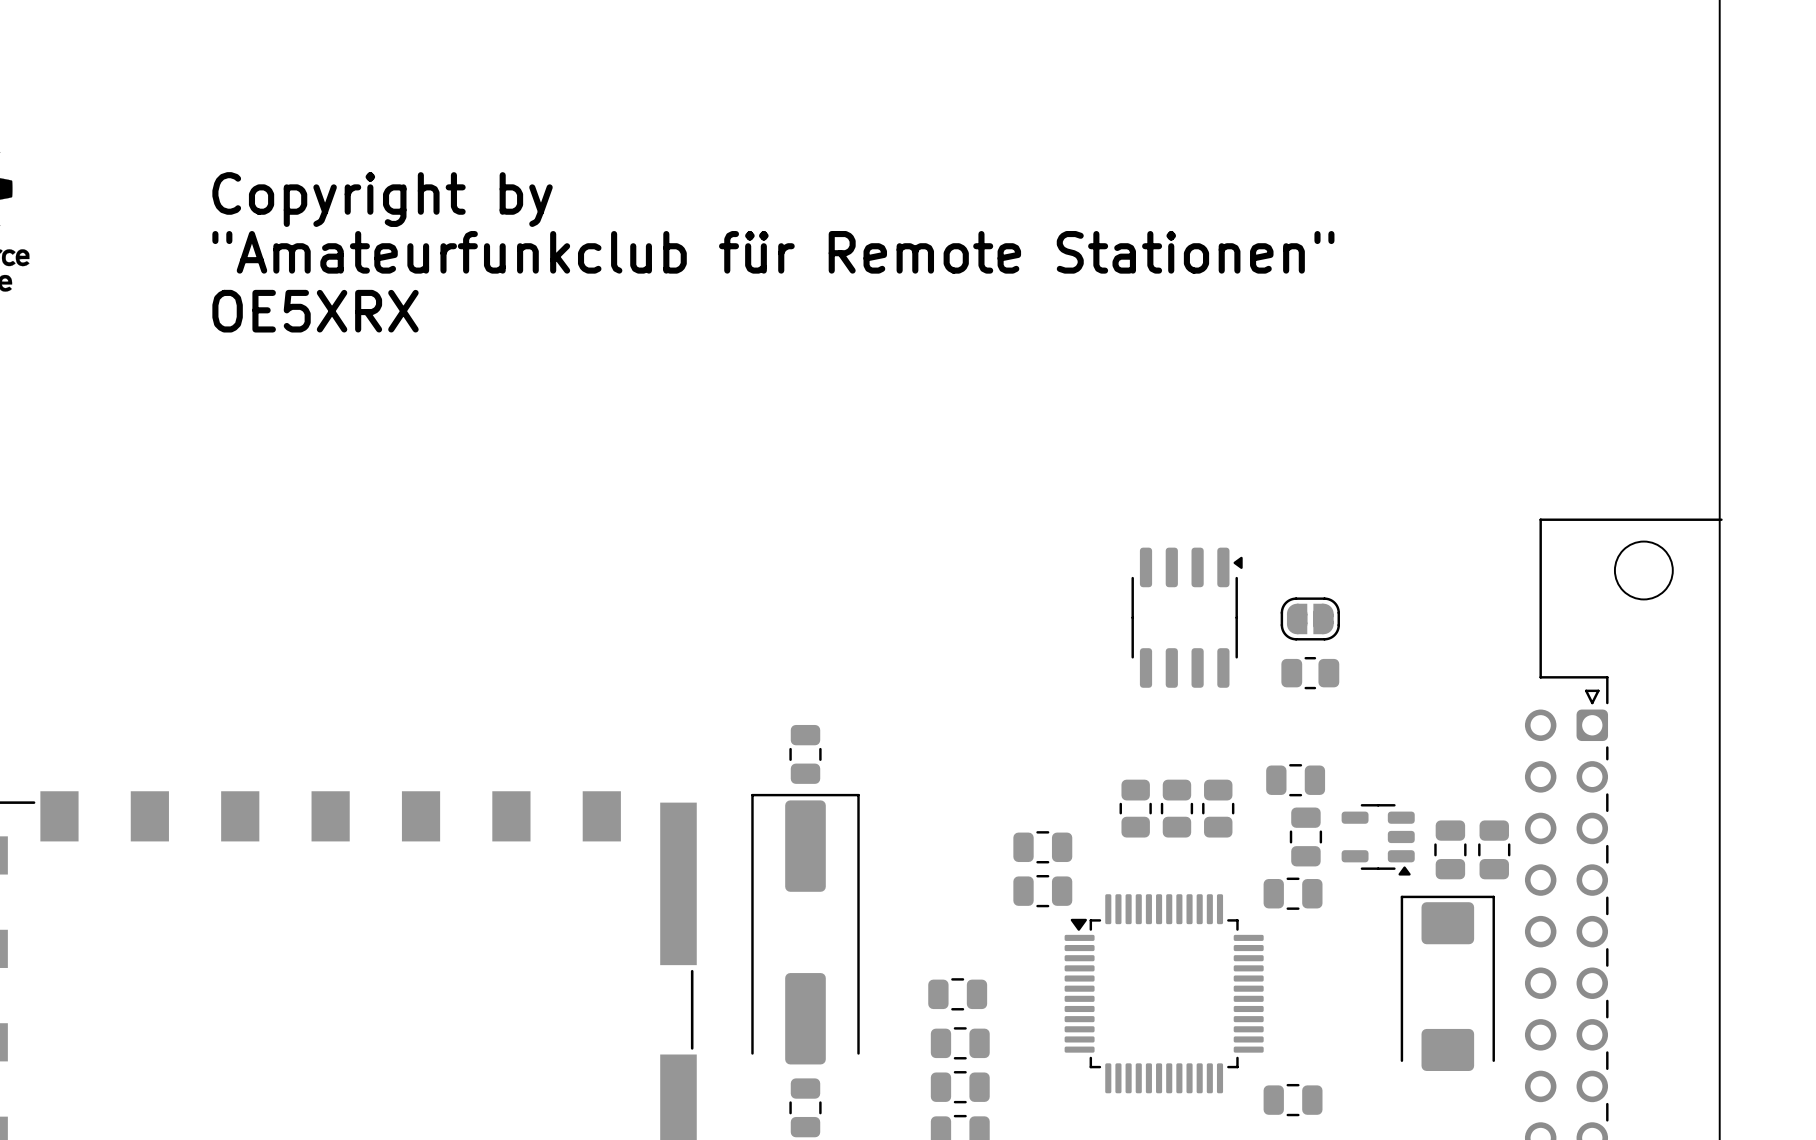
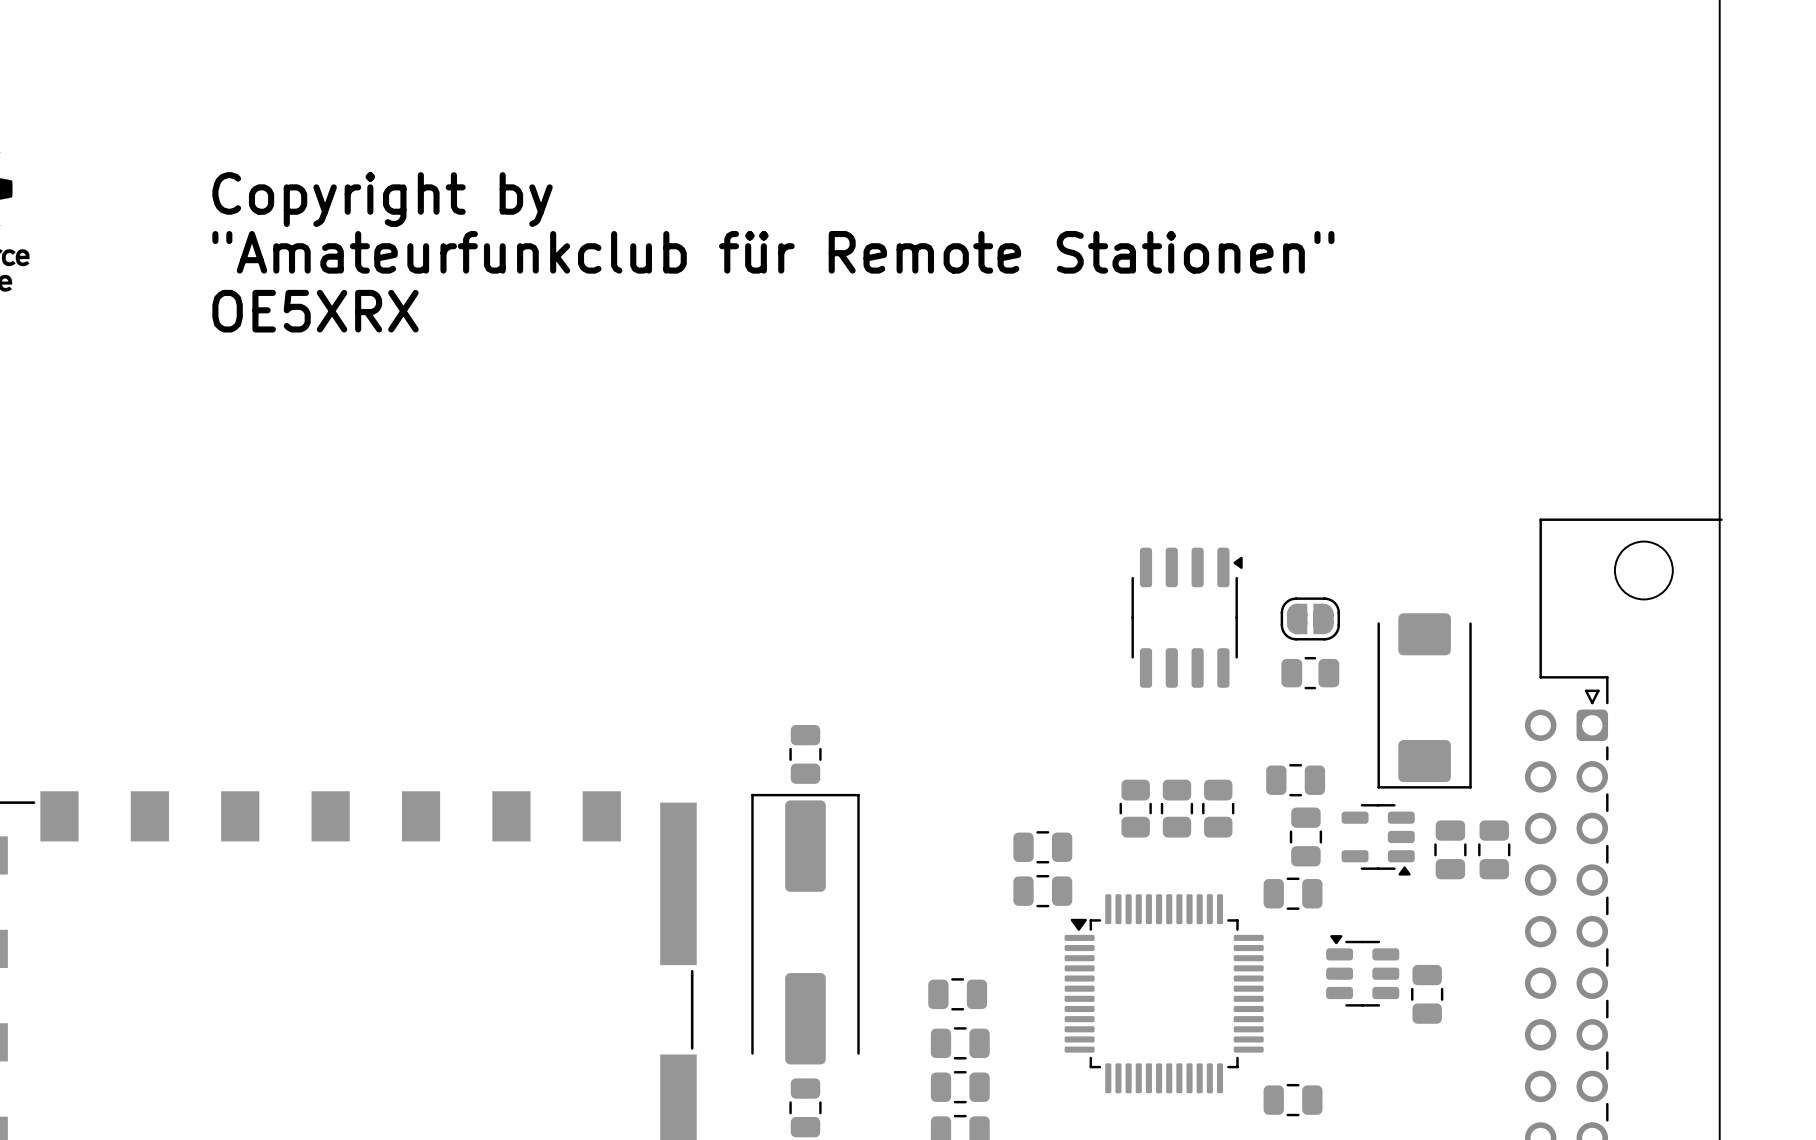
part: none -> (1362, 970)
part rotation: 0° (1447, 983) -> 180° (1424, 700)
part position: (1447, 983) -> (1424, 700)
part: none -> (1427, 994)

